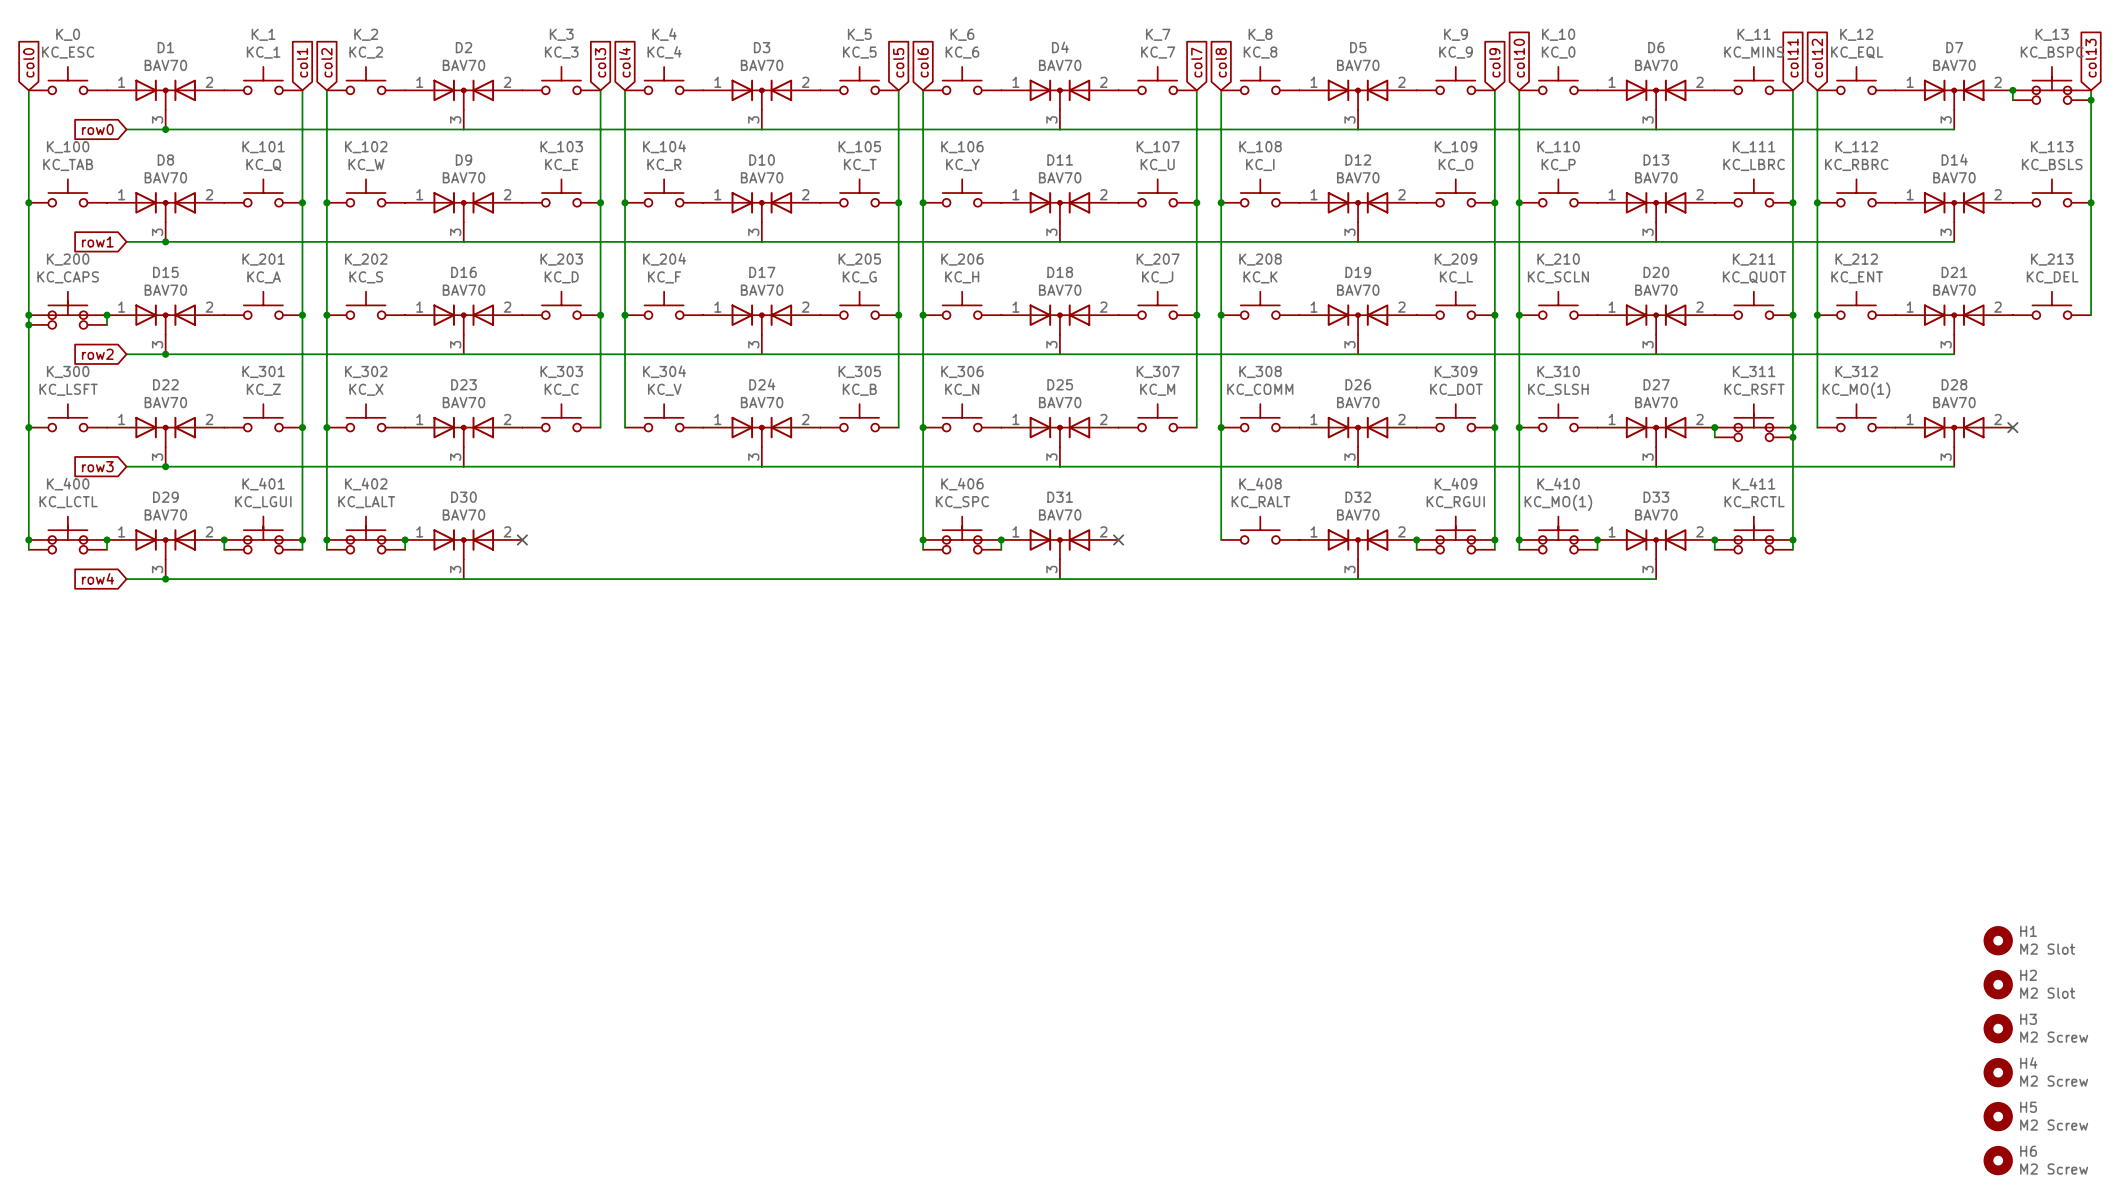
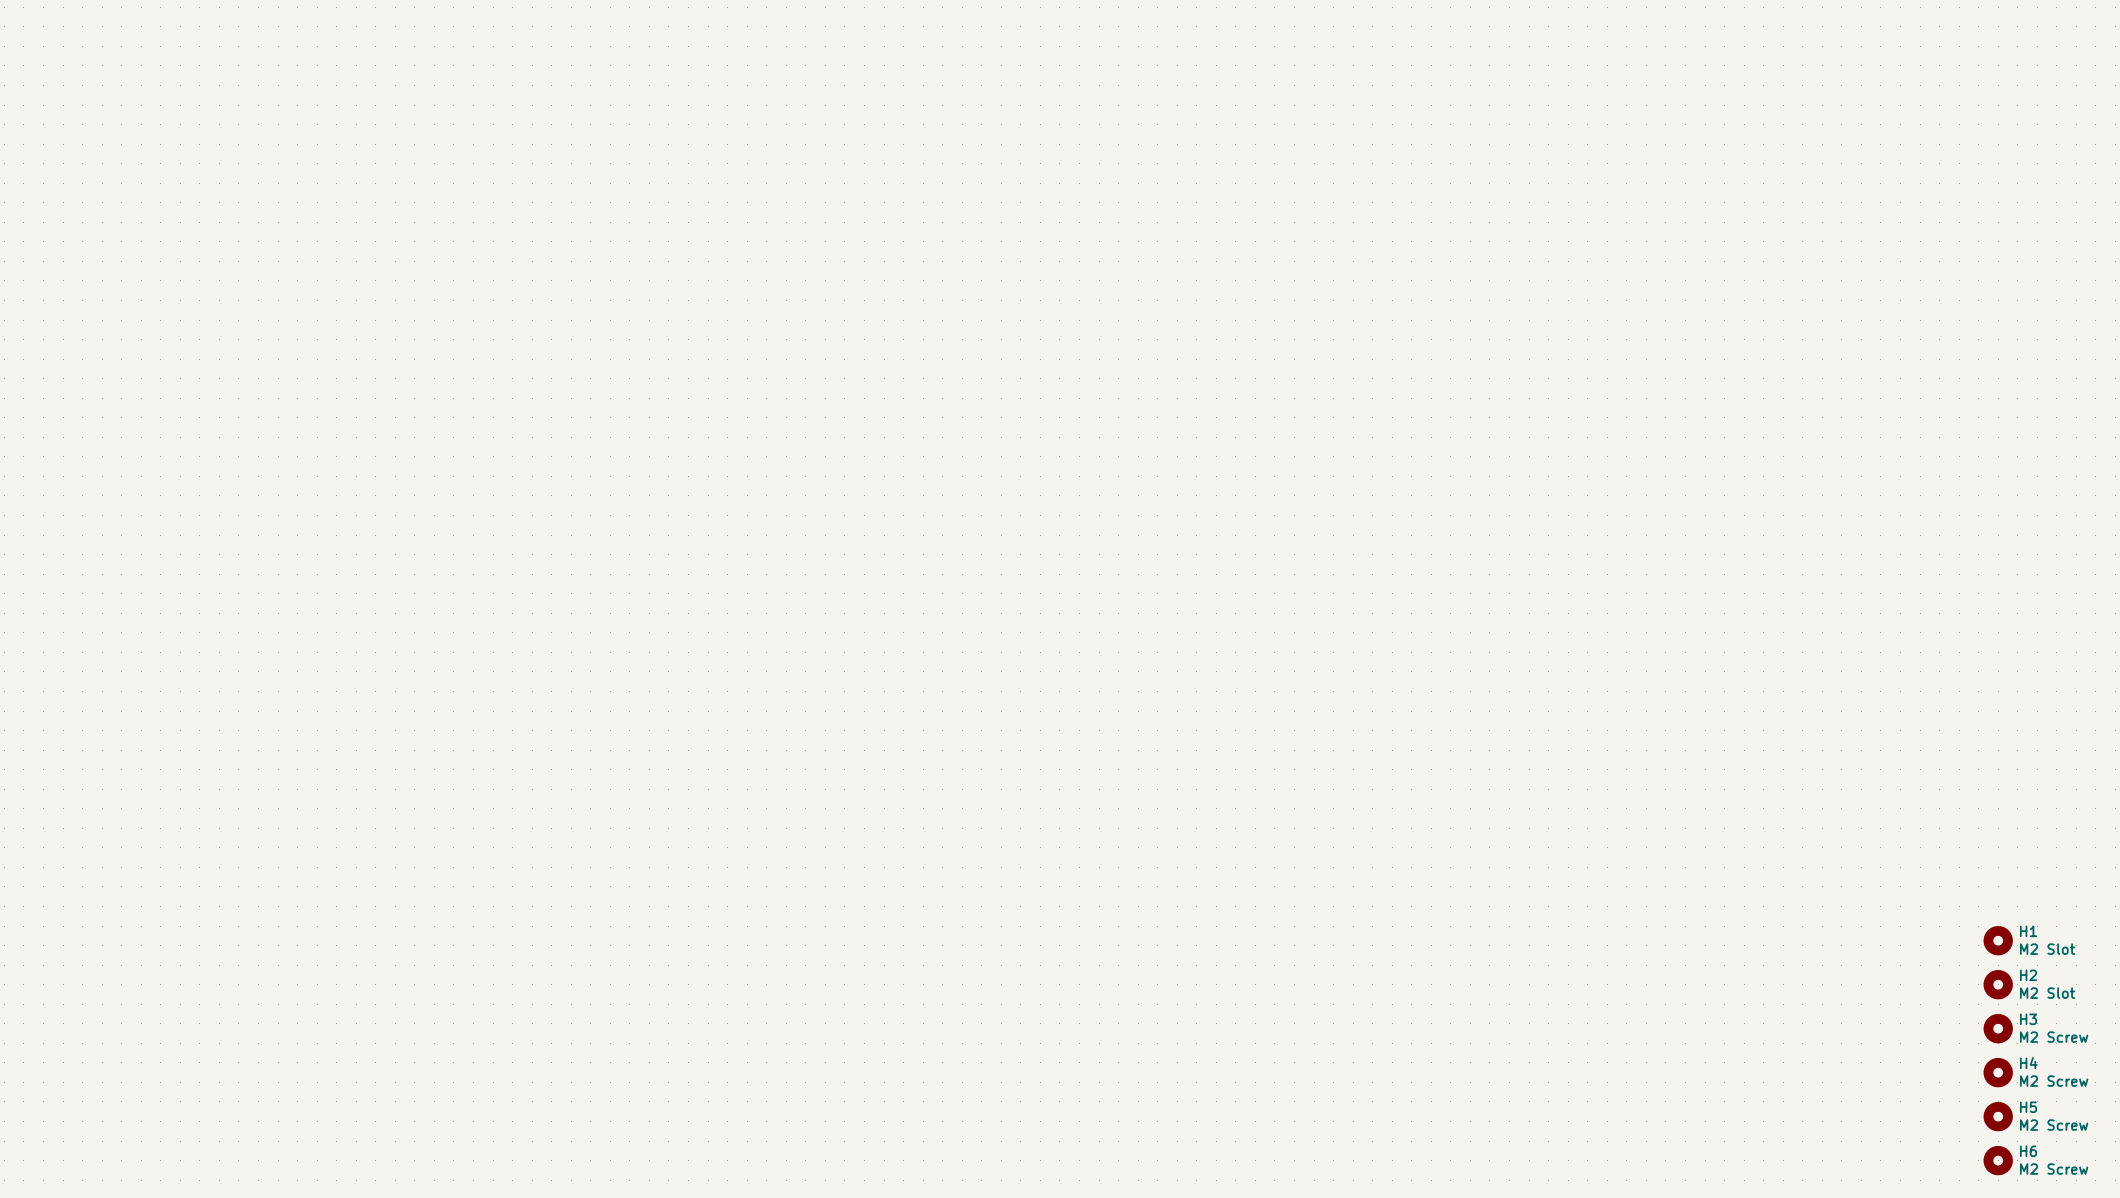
global label: col10 (1519, 58) -> none
global label: col11 (1792, 58) -> none
global label: col12 (1817, 58) -> none
global label: col13 (2091, 58) -> none
global label: col0 (28, 62) -> none
global label: col1 (302, 62) -> none
global label: col2 (326, 62) -> none
global label: col3 (600, 62) -> none
global label: col4 (624, 62) -> none
global label: col5 (898, 62) -> none
global label: col6 (923, 62) -> none
global label: col7 (1196, 62) -> none
global label: col8 (1221, 62) -> none
global label: col9 (1494, 62) -> none
K_0: KC_ESC (67, 80) -> none
K_1: KC_1 (263, 80) -> none
K_2: KC_2 (366, 80) -> none
K_3: KC_3 (561, 80) -> none
K_4: KC_4 (664, 80) -> none
K_5: KC_5 (859, 80) -> none
K_6: KC_6 (962, 80) -> none
K_7: KC_7 (1157, 80) -> none
K_8: KC_8 (1260, 80) -> none
K_9: KC_9 (1455, 80) -> none
K_10: KC_0 (1558, 80) -> none
K_11: KC_MINS (1753, 80) -> none
K_12: KC_EQL (1856, 80) -> none
K_13: KC_BSPC (2051, 80) -> none
wire: (28, 90) (28, 549) -> none
wire: (302, 90) (302, 549) -> none
wire: (326, 90) (326, 549) -> none
wire: (600, 90) (600, 427) -> none
wire: (625, 90) (625, 427) -> none
wire: (898, 90) (898, 427) -> none
wire: (923, 90) (923, 549) -> none
wire: (1196, 90) (1196, 427) -> none
wire: (1221, 90) (1221, 539) -> none
wire: (1494, 90) (1494, 549) -> none
wire: (1519, 90) (1519, 549) -> none
wire: (1792, 90) (1792, 549) -> none
wire: (1817, 90) (1817, 427) -> none
wire: (2012, 90) (2012, 100) -> none
junction: (2012, 90) -> none
part: (2051, 90) -> none
wire: (2091, 90) (2091, 315) -> none
junction: (2091, 100) -> none
D1: BAV70 (165, 104) -> none
D2: BAV70 (463, 104) -> none
D3: BAV70 (761, 104) -> none
D4: BAV70 (1059, 104) -> none
D5: BAV70 (1358, 104) -> none
D6: BAV70 (1656, 104) -> none
D7: BAV70 (1954, 104) -> none
global label: row0 (97, 129) -> none
wire: (126, 129) (1954, 129) -> none
junction: (165, 129) -> none
K_100: KC_TAB (67, 193) -> none
K_101: KC_Q (263, 193) -> none
K_102: KC_W (366, 193) -> none
K_103: KC_E (561, 193) -> none
K_104: KC_R (664, 193) -> none
K_105: KC_T (859, 193) -> none
K_106: KC_Y (962, 193) -> none
K_107: KC_U (1157, 193) -> none
K_108: KC_I (1260, 193) -> none
K_109: KC_O (1455, 193) -> none
K_110: KC_P (1558, 193) -> none
K_111: KC_LBRC (1753, 193) -> none
K_112: KC_RBRC (1856, 193) -> none
K_113: KC_BSLS (2051, 193) -> none
junction: (28, 202) -> none
junction: (302, 202) -> none
junction: (326, 202) -> none
junction: (600, 202) -> none
junction: (625, 202) -> none
junction: (898, 202) -> none
junction: (923, 202) -> none
junction: (1196, 202) -> none
junction: (1221, 202) -> none
junction: (1494, 202) -> none
junction: (1519, 202) -> none
junction: (1792, 202) -> none
junction: (1817, 202) -> none
junction: (2091, 202) -> none
D8: BAV70 (165, 216) -> none
D9: BAV70 (463, 216) -> none
D10: BAV70 (761, 216) -> none
D11: BAV70 (1059, 216) -> none
D12: BAV70 (1358, 216) -> none
D13: BAV70 (1656, 216) -> none
D14: BAV70 (1954, 216) -> none
global label: row1 (97, 241) -> none
wire: (126, 241) (1954, 241) -> none
junction: (165, 241) -> none
K_200: KC_CAPS (67, 305) -> none
K_201: KC_A (263, 305) -> none
K_202: KC_S (366, 305) -> none
K_203: KC_D (561, 305) -> none
K_204: KC_F (664, 305) -> none
K_205: KC_G (859, 305) -> none
K_206: KC_H (962, 305) -> none
K_207: KC_J (1157, 305) -> none
K_208: KC_K (1260, 305) -> none
K_209: KC_L (1455, 305) -> none
K_210: KC_SCLN (1558, 305) -> none
K_211: KC_QUOT (1753, 305) -> none
K_212: KC_ENT (1856, 305) -> none
K_213: KC_DEL (2051, 305) -> none
junction: (28, 315) -> none
part: (67, 315) -> none
wire: (107, 315) (107, 324) -> none
junction: (107, 315) -> none
junction: (302, 315) -> none
junction: (326, 315) -> none
junction: (600, 315) -> none
junction: (625, 315) -> none
junction: (898, 315) -> none
junction: (923, 315) -> none
junction: (1196, 315) -> none
junction: (1221, 315) -> none
junction: (1494, 315) -> none
junction: (1519, 315) -> none
junction: (1792, 315) -> none
junction: (1817, 315) -> none
junction: (28, 324) -> none
D15: BAV70 (165, 329) -> none
D16: BAV70 (463, 329) -> none
D17: BAV70 (761, 329) -> none
D18: BAV70 (1059, 329) -> none
D19: BAV70 (1358, 329) -> none
D20: BAV70 (1656, 329) -> none
D21: BAV70 (1954, 329) -> none
global label: row2 (97, 354) -> none
wire: (126, 354) (1954, 354) -> none
junction: (165, 354) -> none
K_300: KC_LSFT (67, 417) -> none
K_301: KC_Z (263, 417) -> none
K_302: KC_X (366, 417) -> none
K_303: KC_C (561, 417) -> none
K_304: KC_V (664, 417) -> none
K_305: KC_B (859, 417) -> none
K_306: KC_N (962, 417) -> none
K_307: KC_M (1157, 417) -> none
K_308: KC_COMM (1260, 417) -> none
K_309: KC_DOT (1455, 417) -> none
K_310: KC_SLSH (1558, 417) -> none
K_311: KC_RSFT (1753, 417) -> none
K_312: KC_MO(1) (1856, 417) -> none
junction: (28, 427) -> none
junction: (302, 427) -> none
junction: (326, 427) -> none
junction: (923, 427) -> none
junction: (1221, 427) -> none
junction: (1494, 427) -> none
junction: (1519, 427) -> none
wire: (1714, 427) (1714, 437) -> none
junction: (1714, 427) -> none
part: (1753, 427) -> none
junction: (1792, 427) -> none
no-connect mark: (2012, 427) -> none
junction: (1792, 437) -> none
D22: BAV70 (165, 441) -> none
D23: BAV70 (463, 441) -> none
D24: BAV70 (761, 441) -> none
D25: BAV70 (1059, 441) -> none
D26: BAV70 (1358, 441) -> none
D27: BAV70 (1656, 441) -> none
D28: BAV70 (1954, 441) -> none
global label: row3 (97, 466) -> none
wire: (126, 466) (1954, 466) -> none
junction: (165, 466) -> none
K_400: KC_LCTL (67, 530) -> none
K_401: KC_LGUI (263, 530) -> none
K_402: KC_LALT (366, 530) -> none
K_406: KC_SPC (962, 530) -> none
K_408: KC_RALT (1260, 530) -> none
K_409: KC_RGUI (1455, 530) -> none
K_410: KC_MO(1) (1558, 530) -> none
K_411: KC_RCTL (1753, 530) -> none
junction: (28, 539) -> none
part: (67, 539) -> none
wire: (107, 539) (107, 549) -> none
junction: (107, 539) -> none
wire: (224, 539) (224, 549) -> none
junction: (224, 539) -> none
part: (263, 539) -> none
junction: (302, 539) -> none
junction: (326, 539) -> none
part: (366, 539) -> none
wire: (405, 539) (405, 549) -> none
junction: (405, 539) -> none
no-connect mark: (522, 539) -> none
junction: (923, 539) -> none
part: (962, 539) -> none
wire: (1001, 539) (1001, 549) -> none
junction: (1001, 539) -> none
no-connect mark: (1118, 539) -> none
wire: (1416, 539) (1416, 549) -> none
junction: (1416, 539) -> none
part: (1455, 539) -> none
junction: (1494, 539) -> none
junction: (1519, 539) -> none
part: (1558, 539) -> none
wire: (1597, 539) (1597, 549) -> none
junction: (1597, 539) -> none
wire: (1714, 539) (1714, 549) -> none
junction: (1714, 539) -> none
part: (1753, 539) -> none
junction: (1792, 539) -> none
D29: BAV70 (165, 554) -> none
D30: BAV70 (463, 554) -> none
D31: BAV70 (1059, 554) -> none
D32: BAV70 (1358, 554) -> none
D33: BAV70 (1656, 554) -> none
global label: row4 (98, 578) -> none
wire: (126, 579) (1656, 579) -> none
junction: (165, 579) -> none

